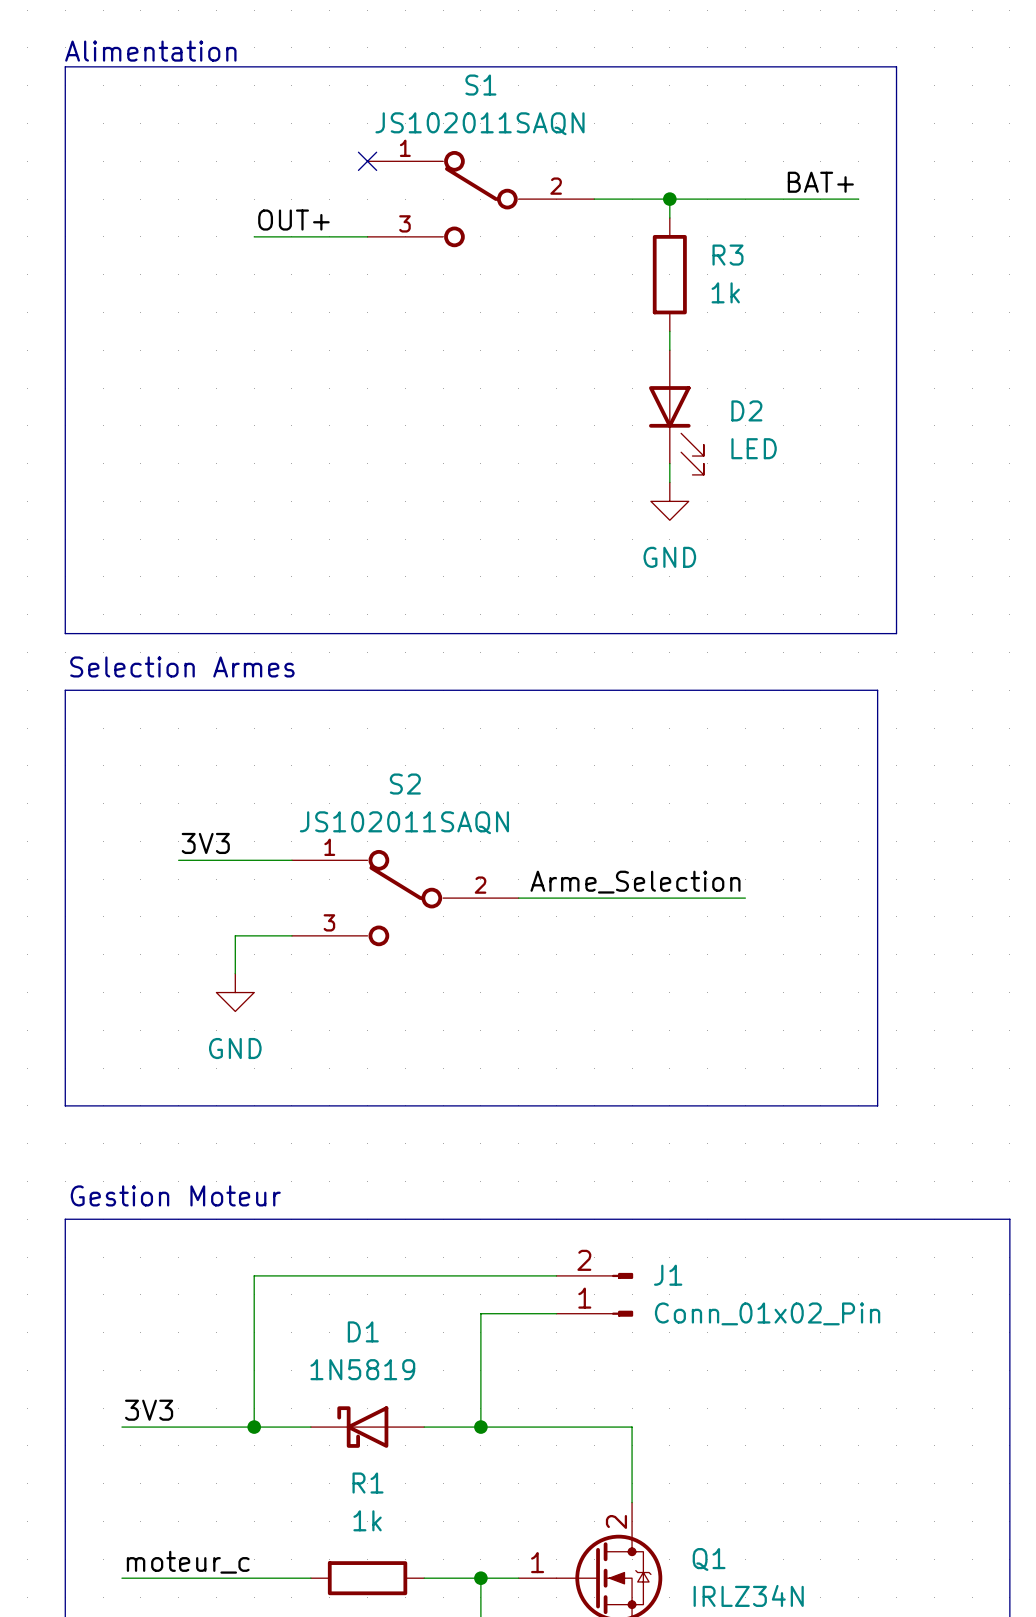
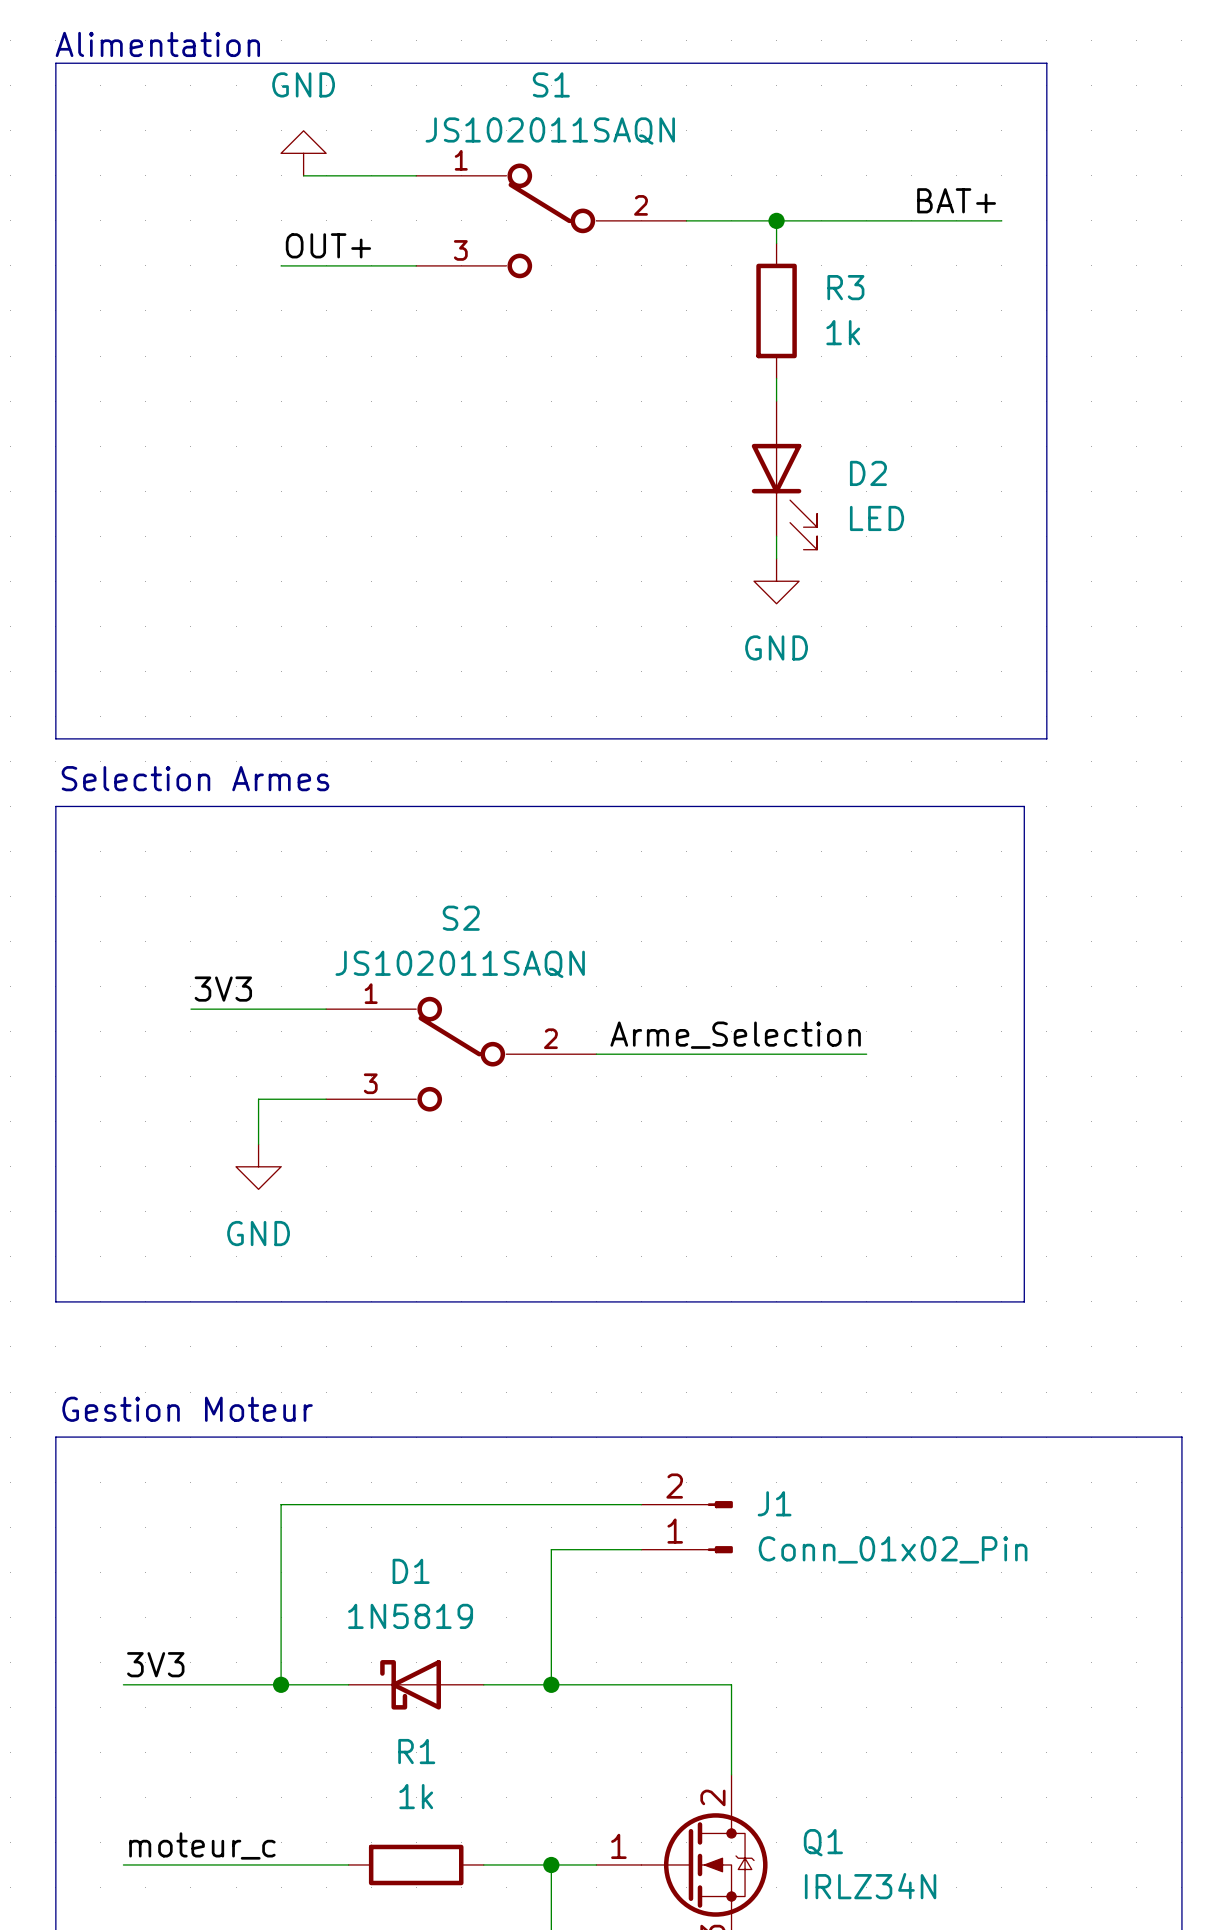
power symbol: none -> GND (303, 153)
wire: none -> (303, 175) (416, 175)
no-connect mark: (367, 161) -> none

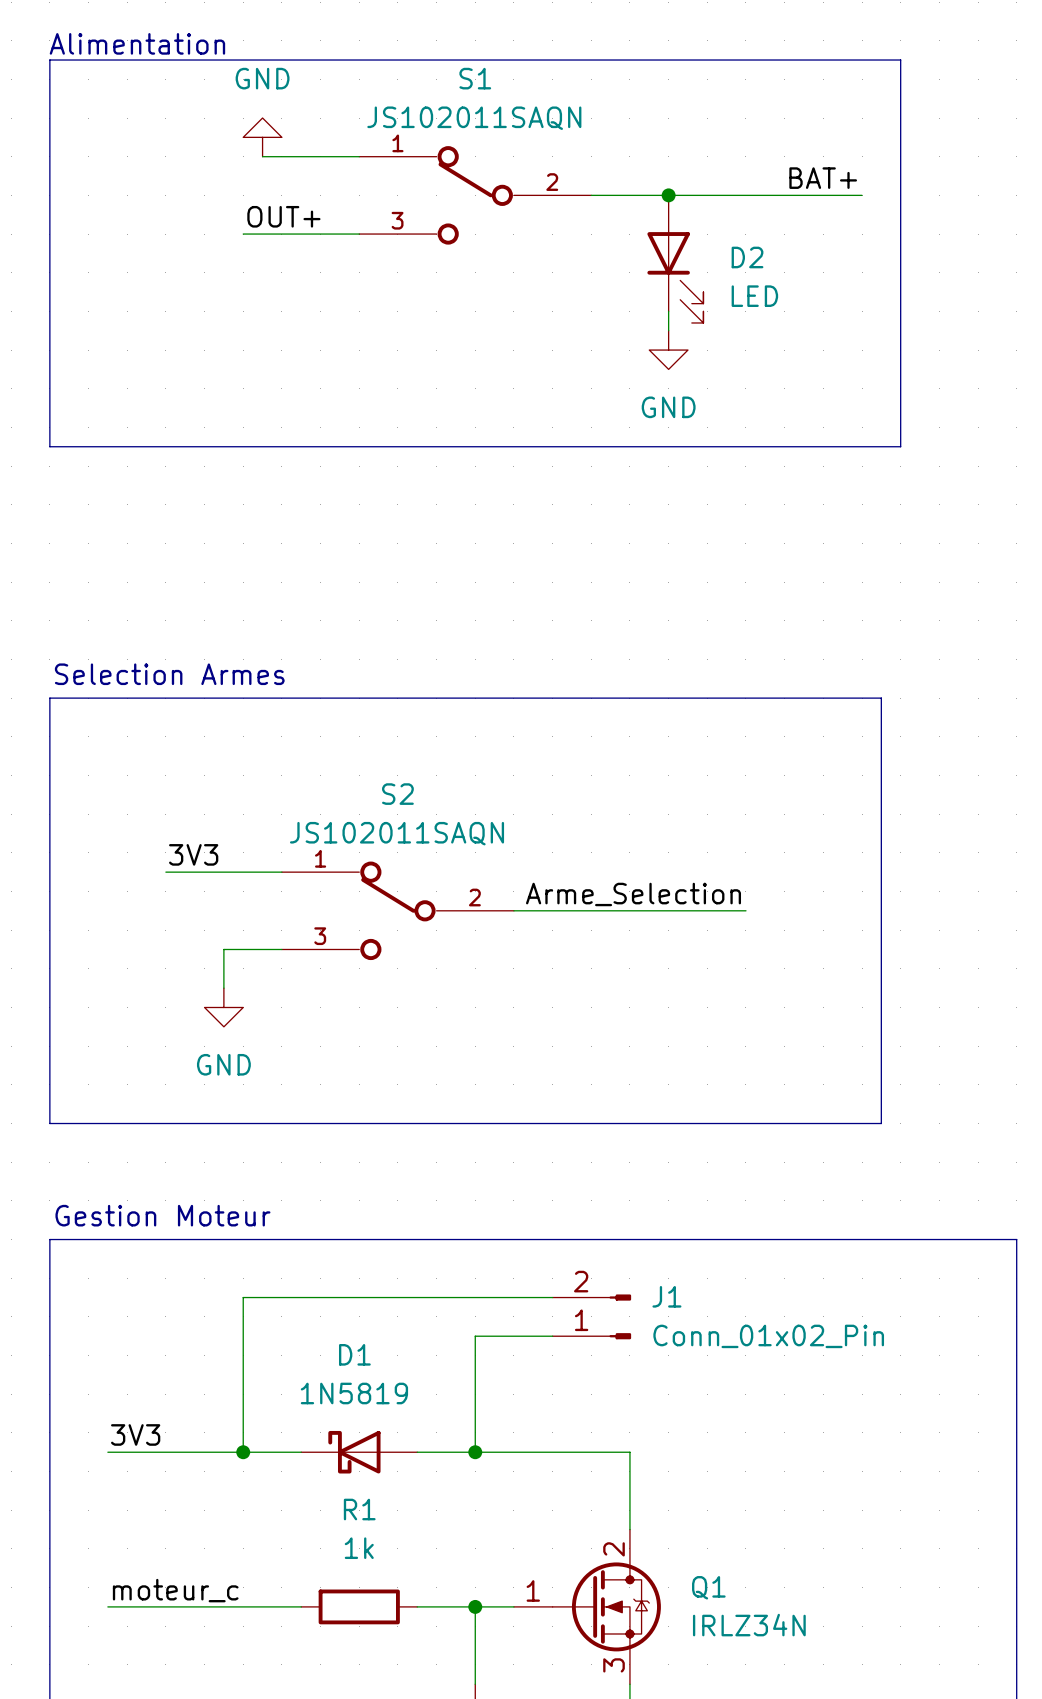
R3: 1k (776, 310) -> none
D2 position: (784, 475) -> (675, 259)
line: (55, 513) (55, 738) (1046, 738) (1046, 513) -> (49, 446) (900, 446)
wire: (776, 536) (776, 558) -> none
power symbol position: GND (776, 581) -> GND (668, 350)

